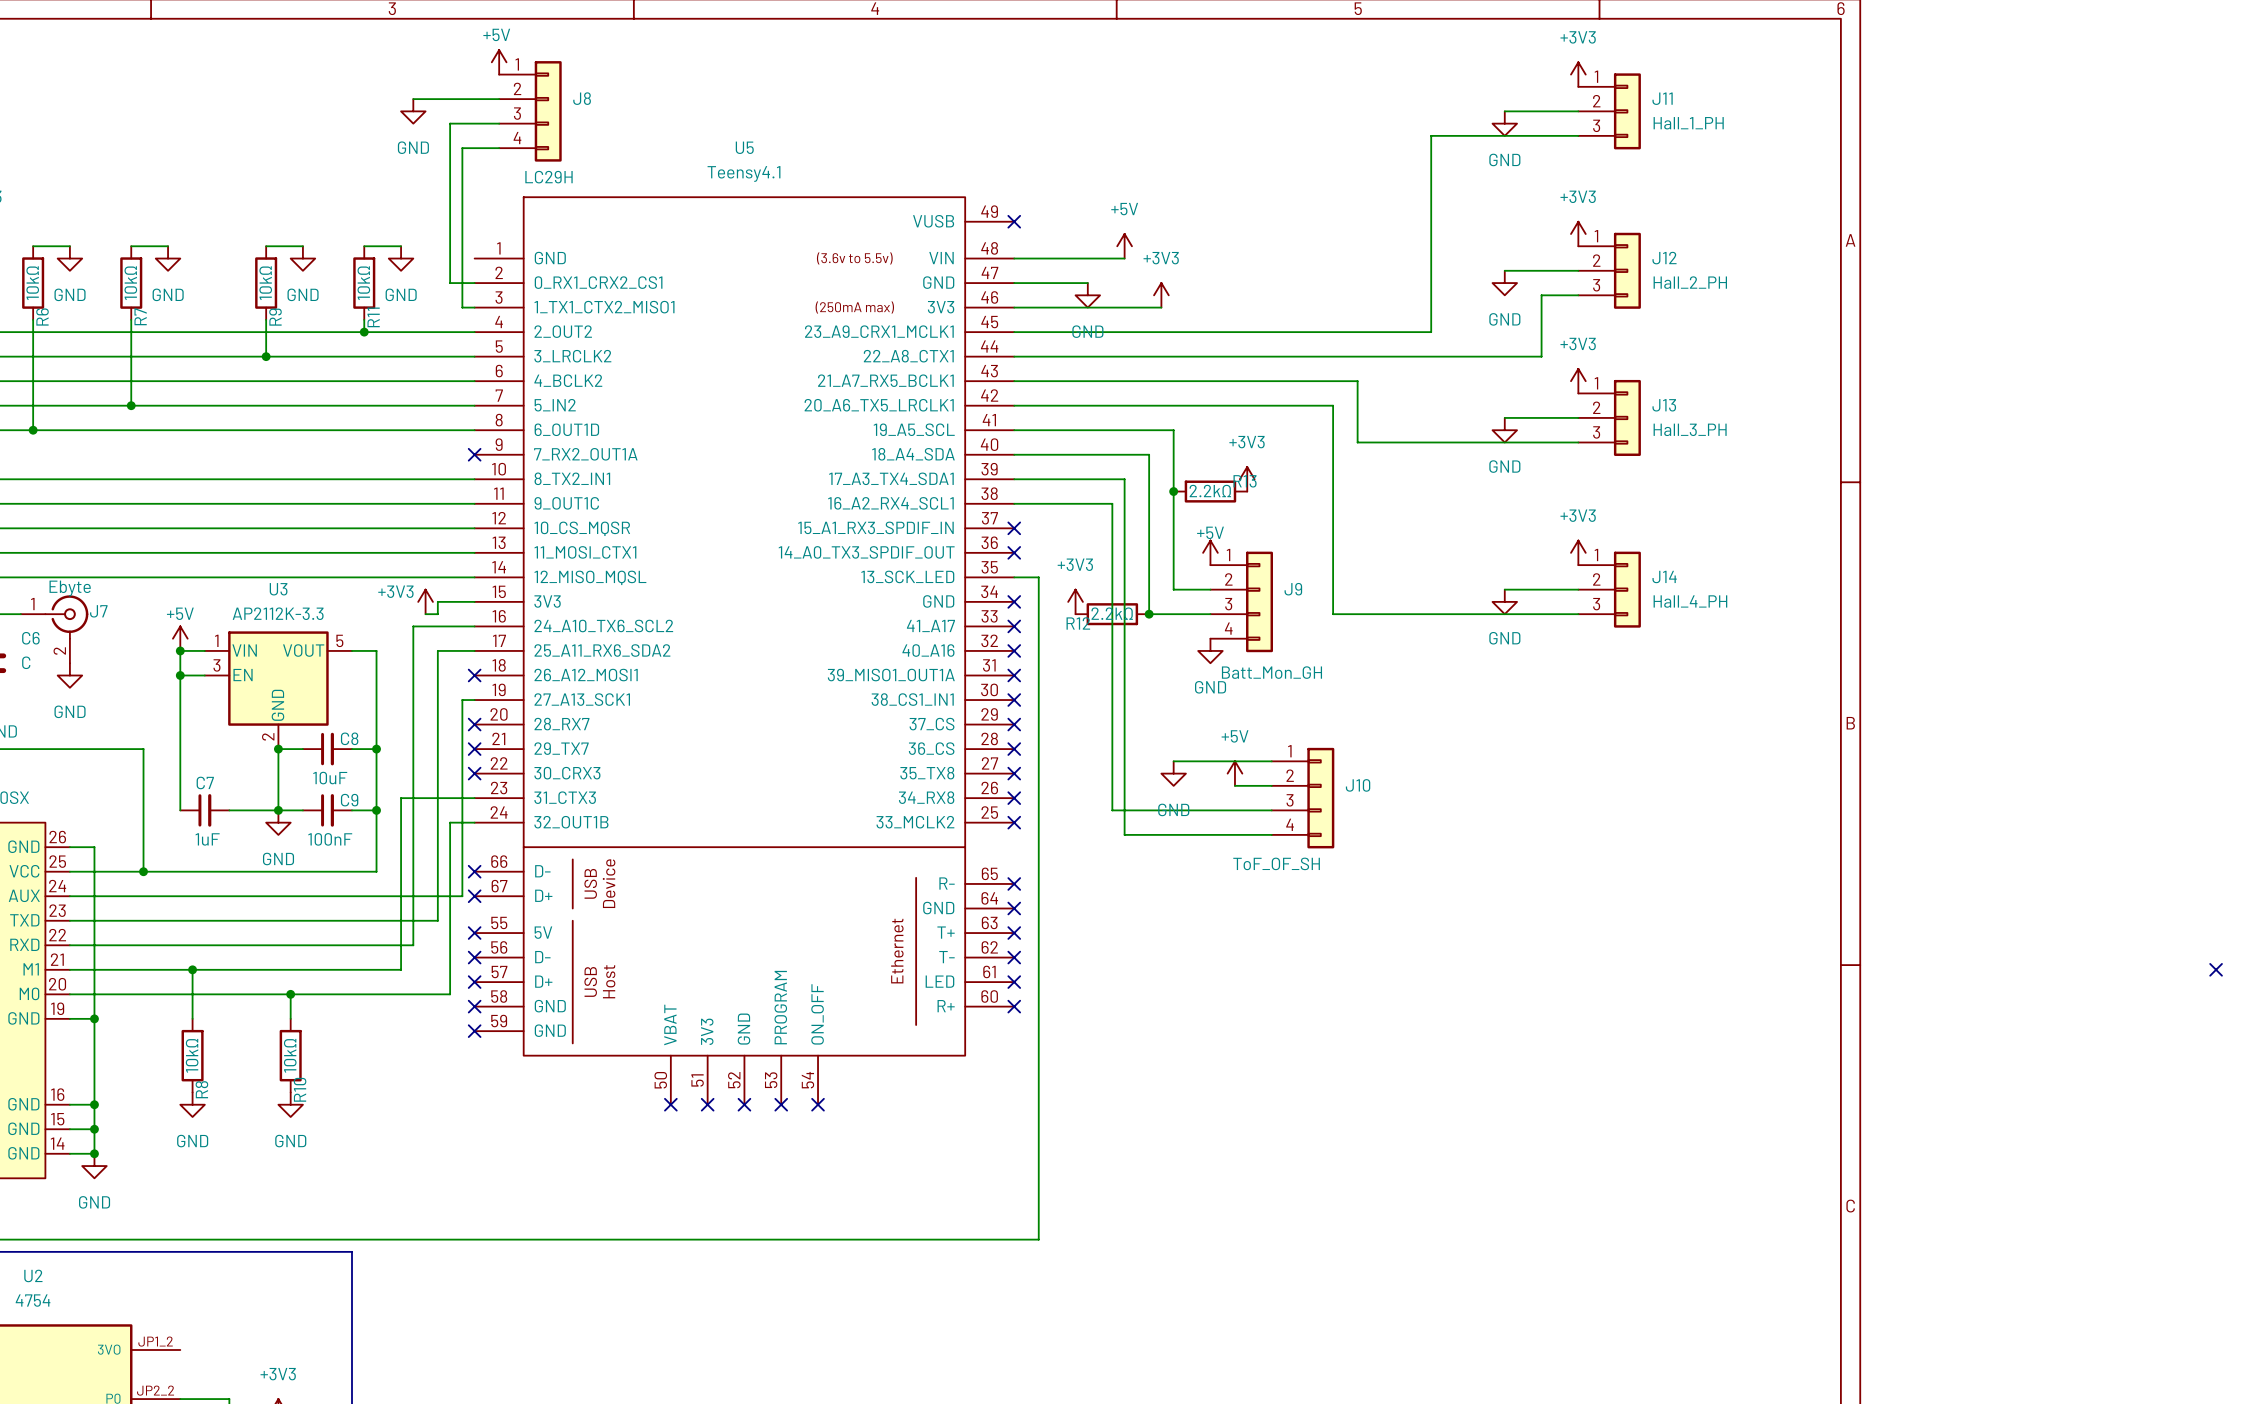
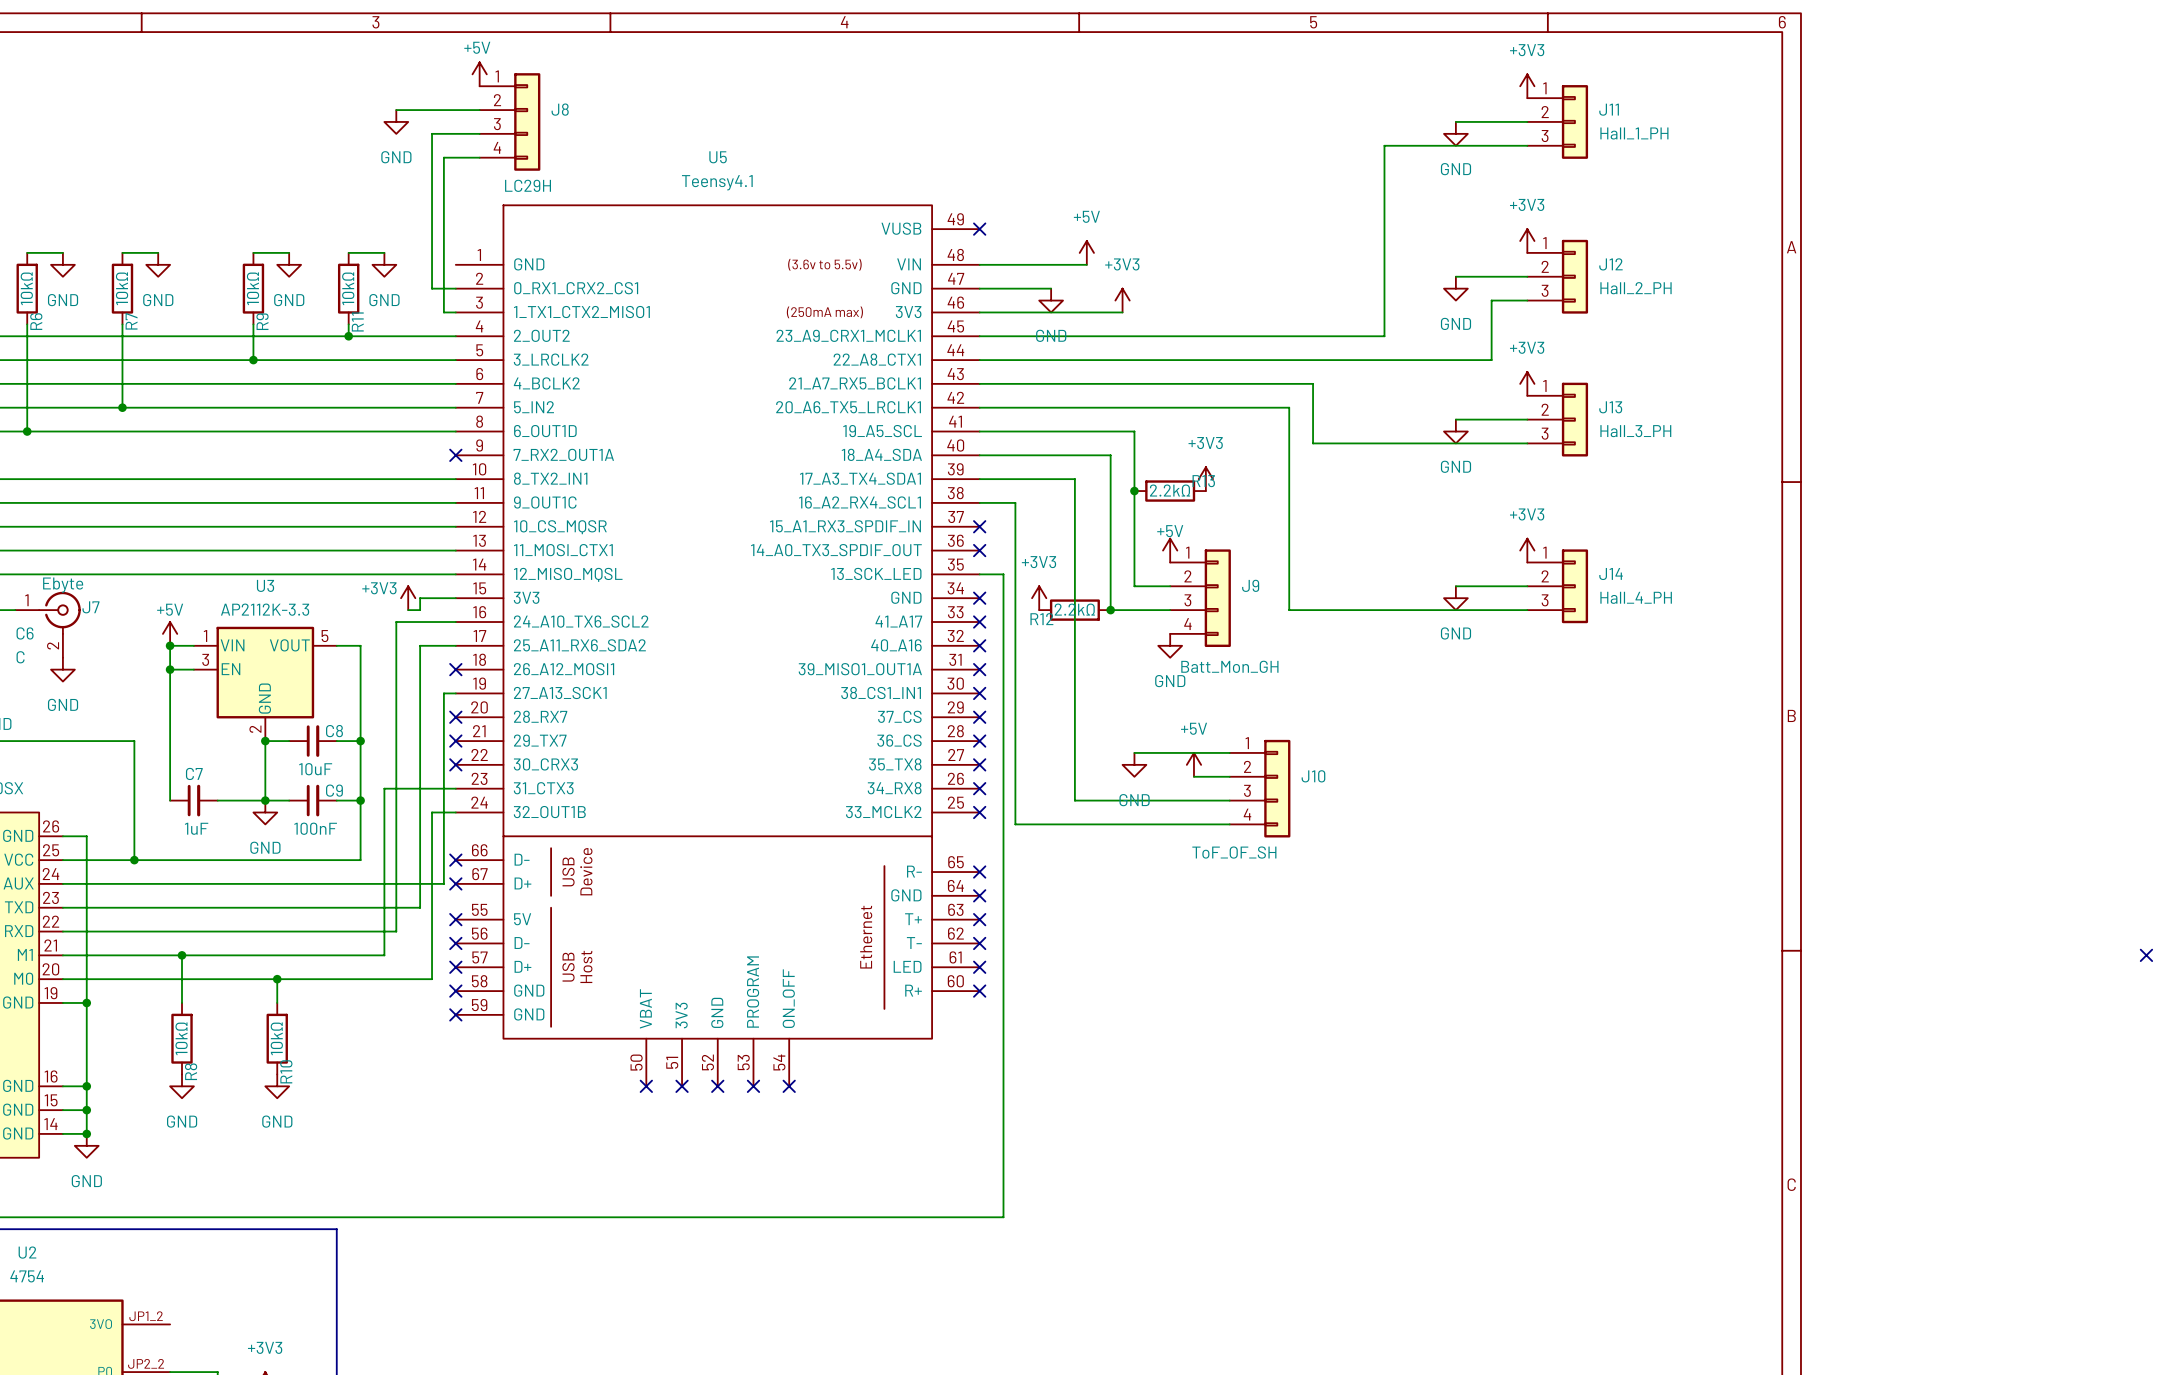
wire: (1112, 479) (1124, 479) (1124, 834) -> (1015, 502) (1015, 824) (1086, 824)
wire: (1051, 503) (1112, 503) -> (1074, 479) (1074, 502)

